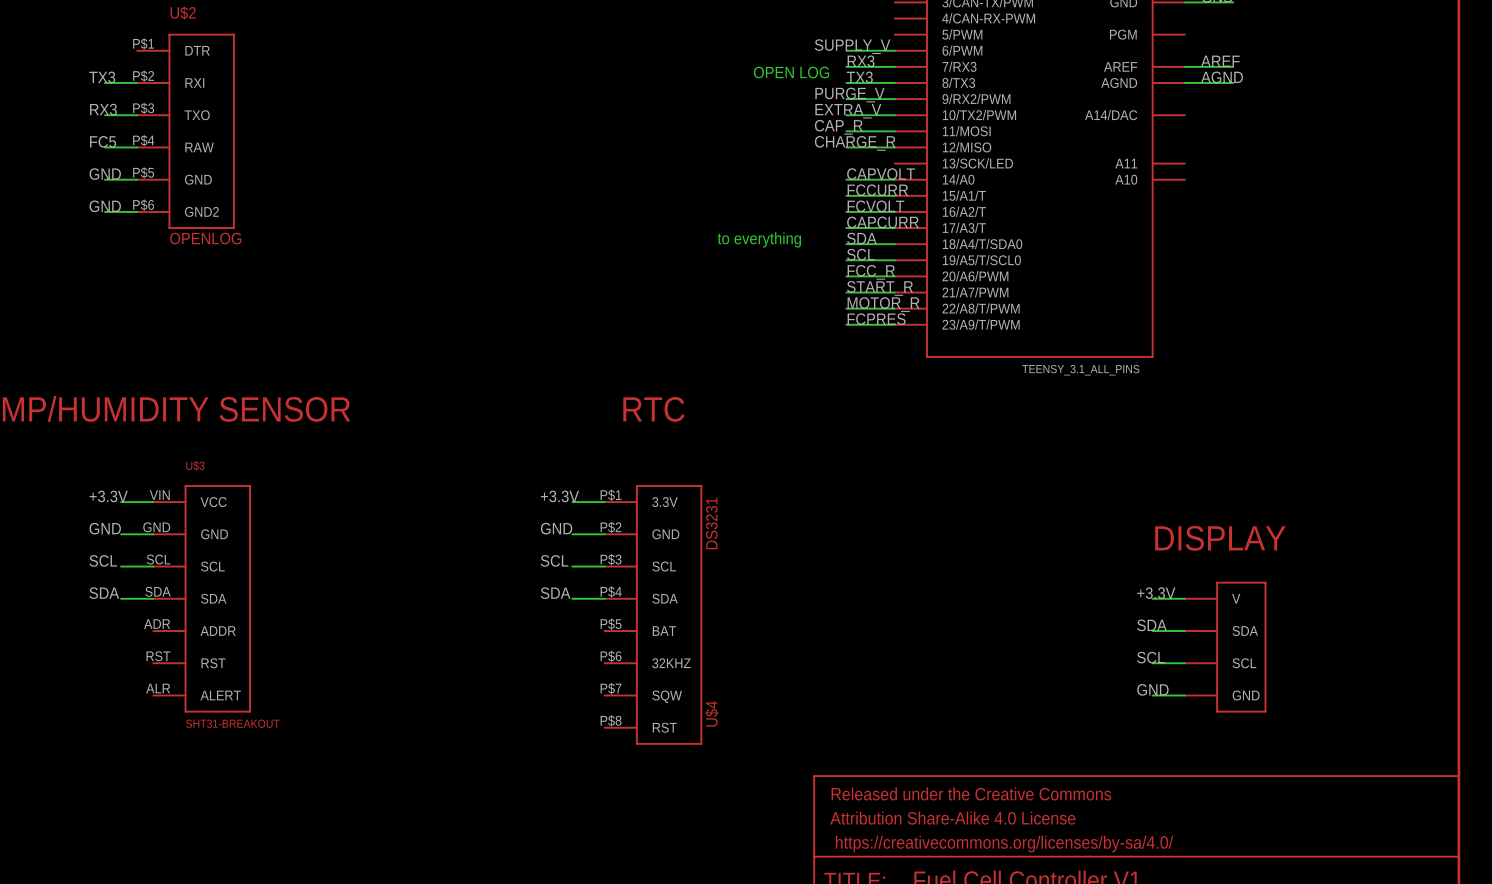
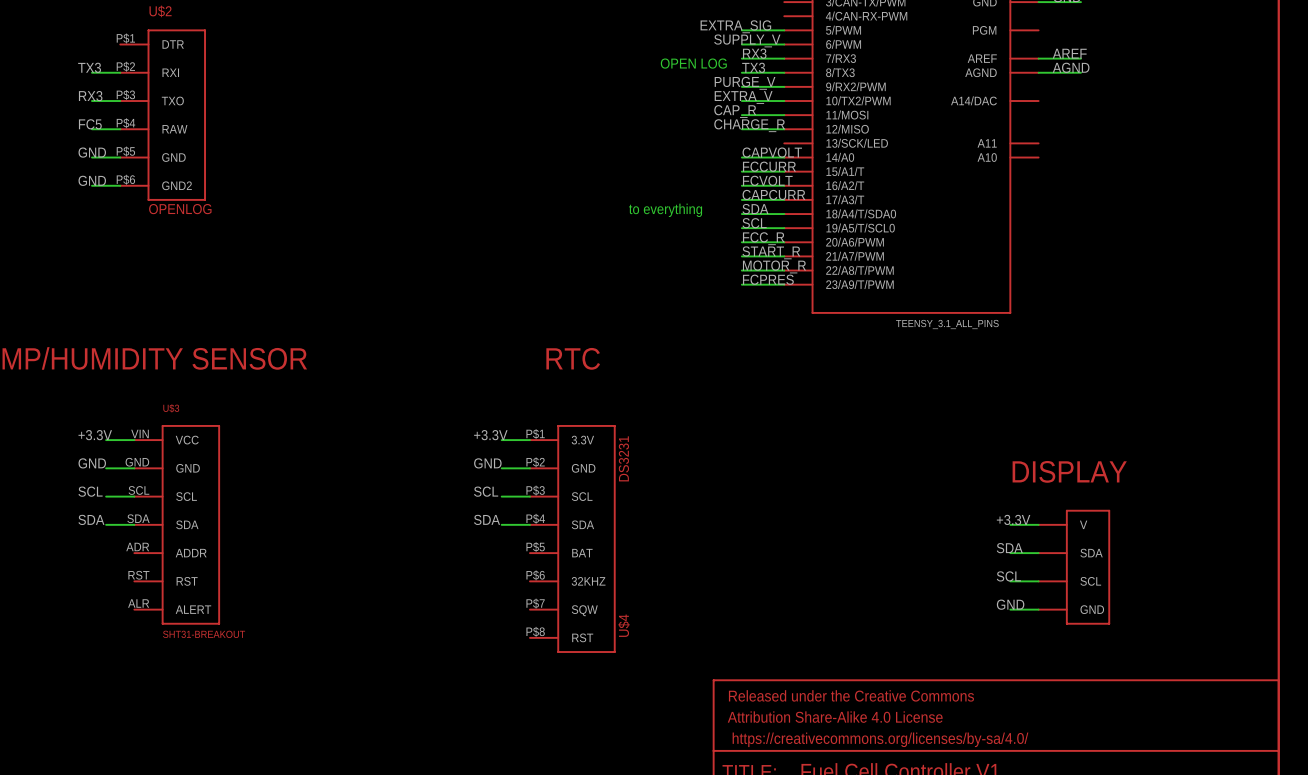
label: none -> EXTRA_SIG (735, 26)
wire: none -> (741, 30) (784, 30)

